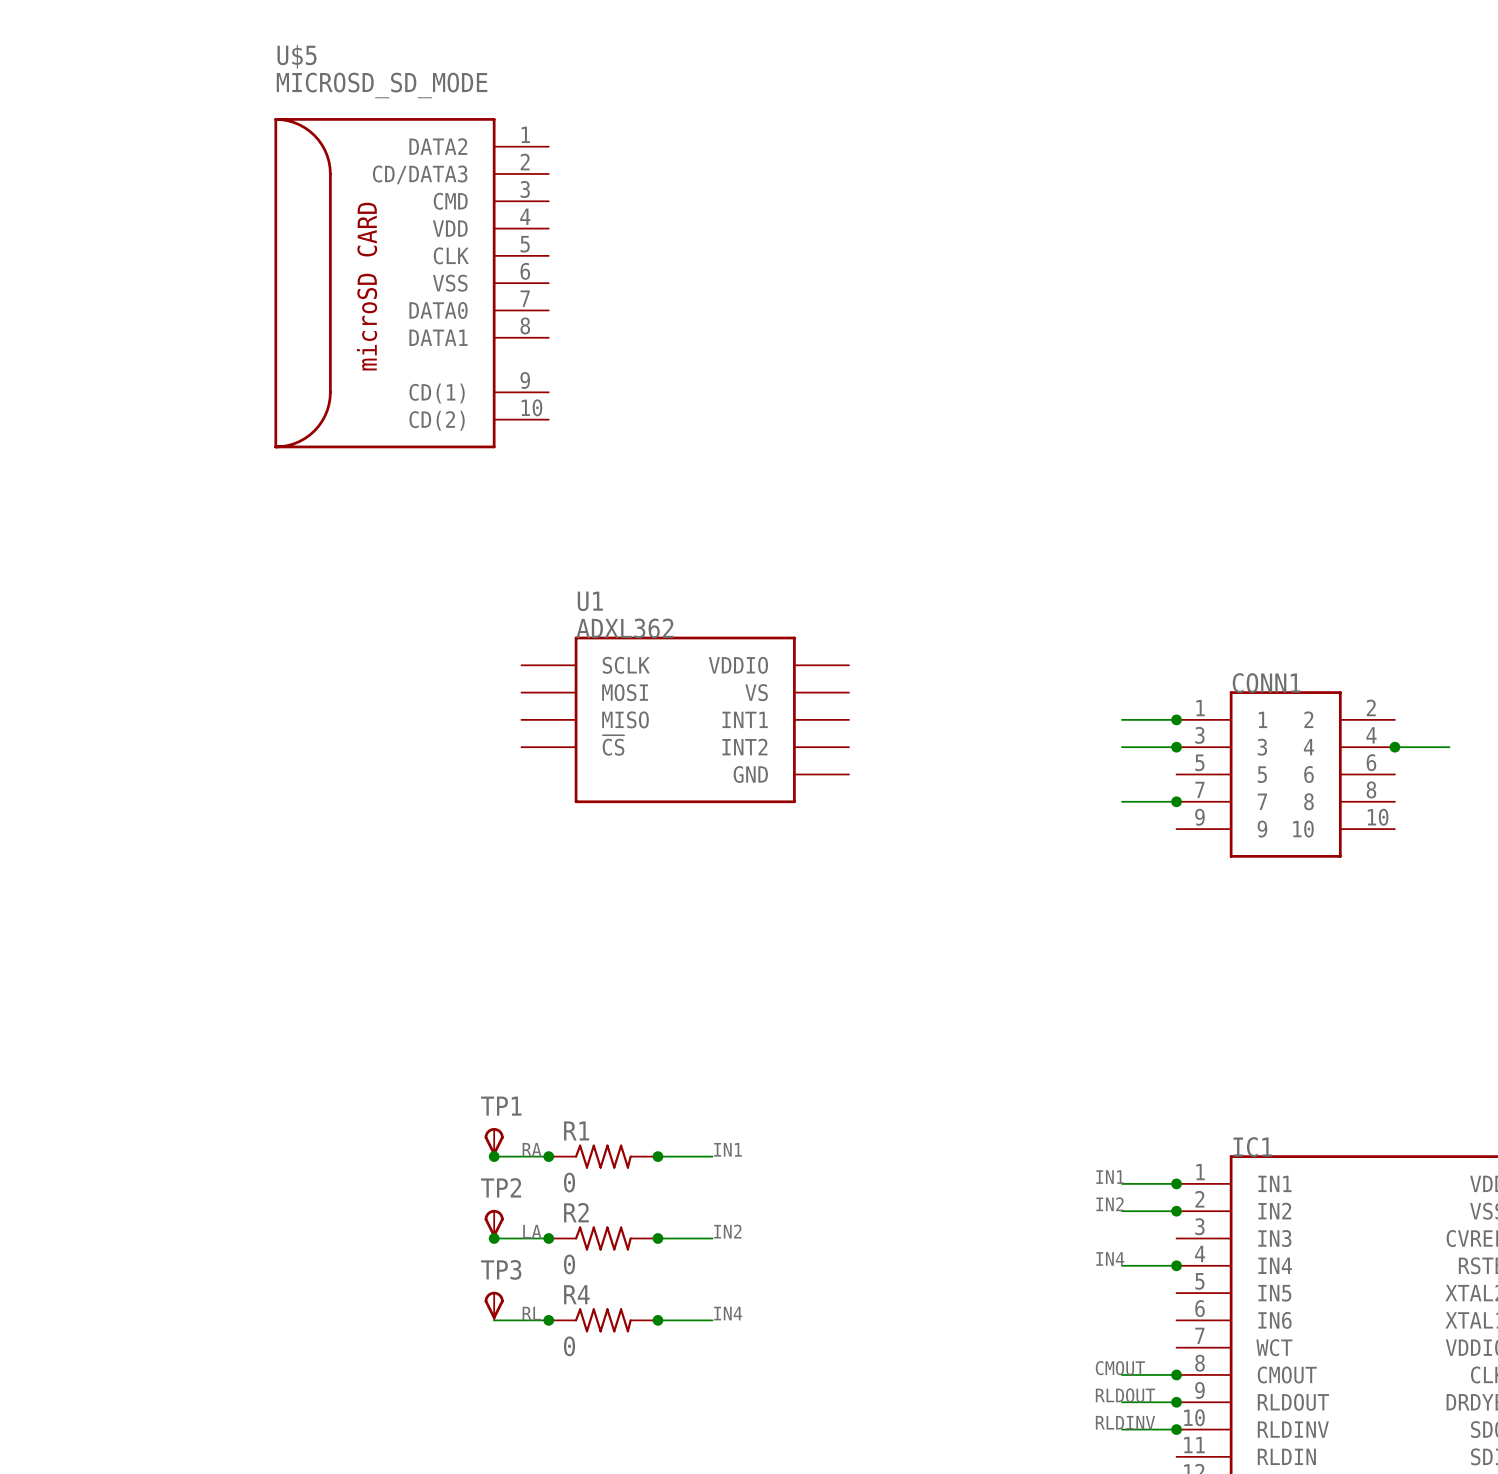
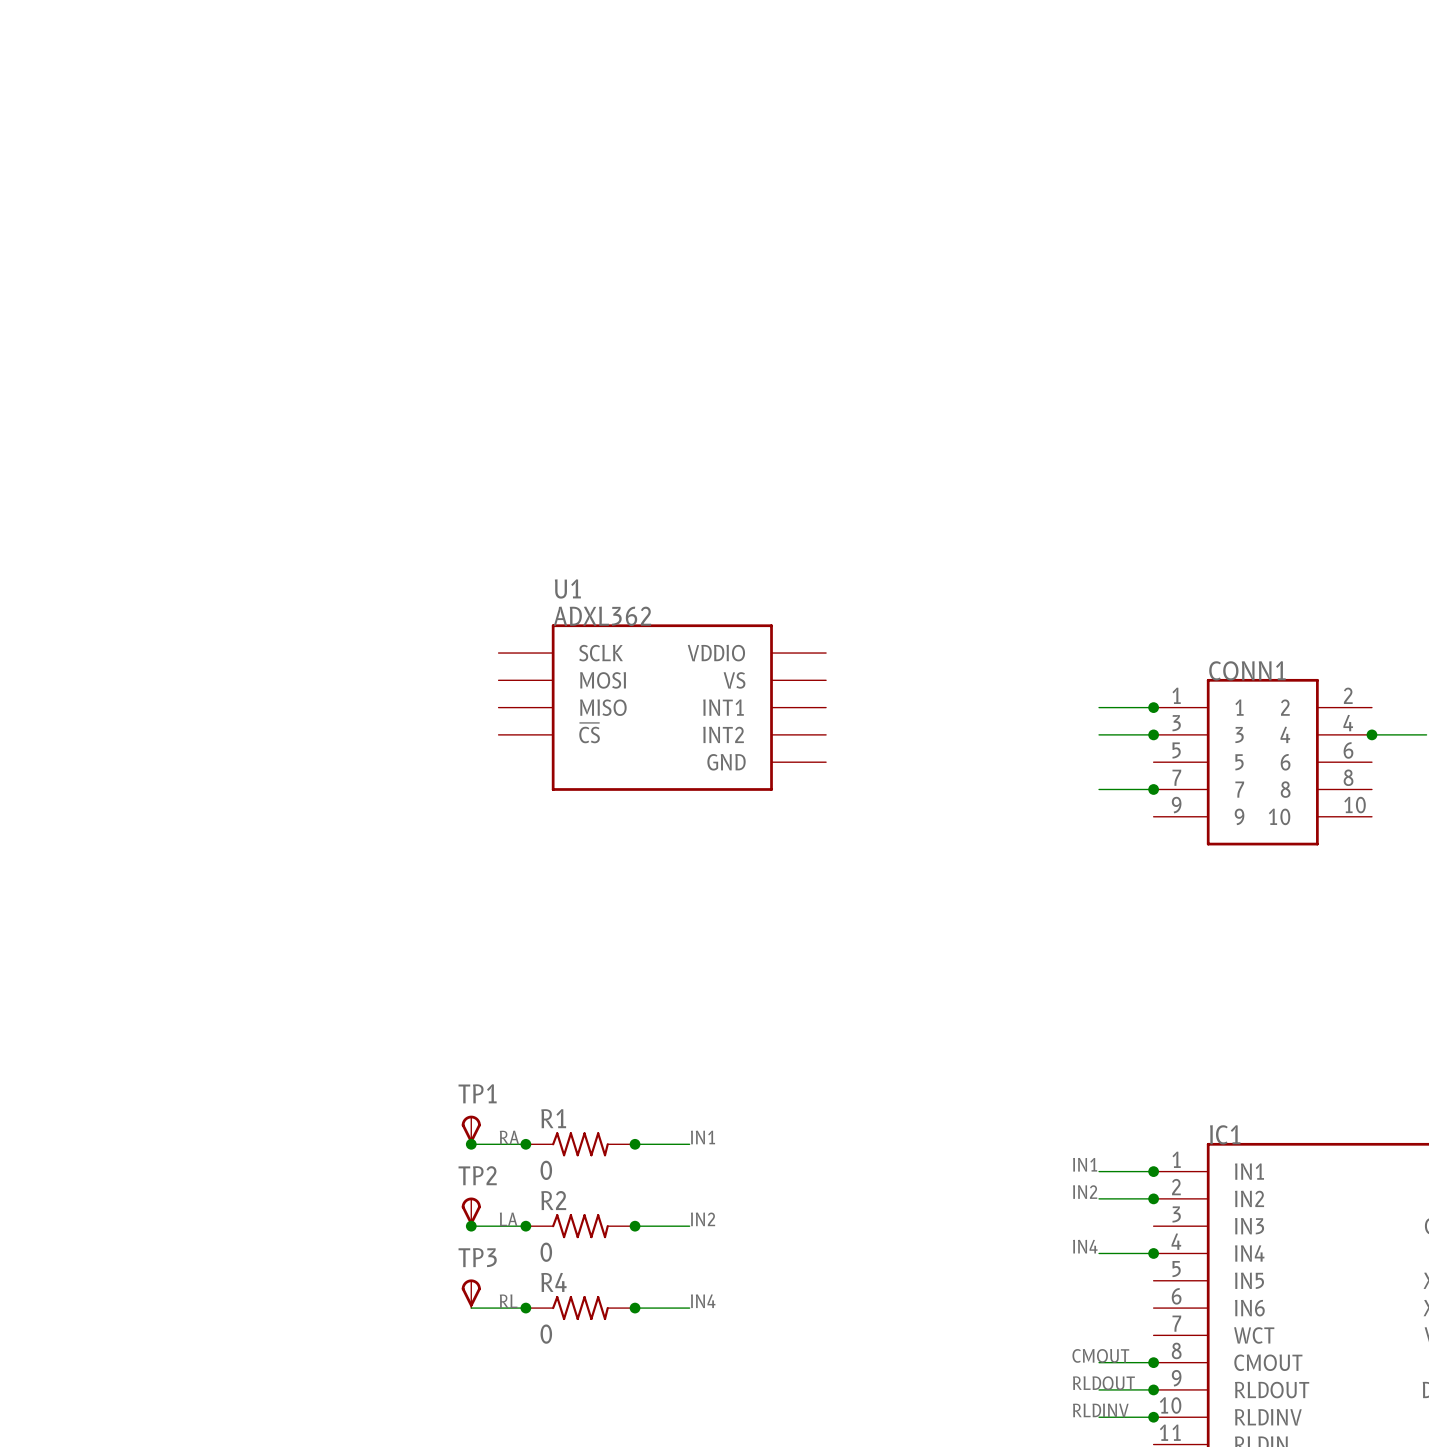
U$5: MICROSD_SD_MODE (411, 283) -> none

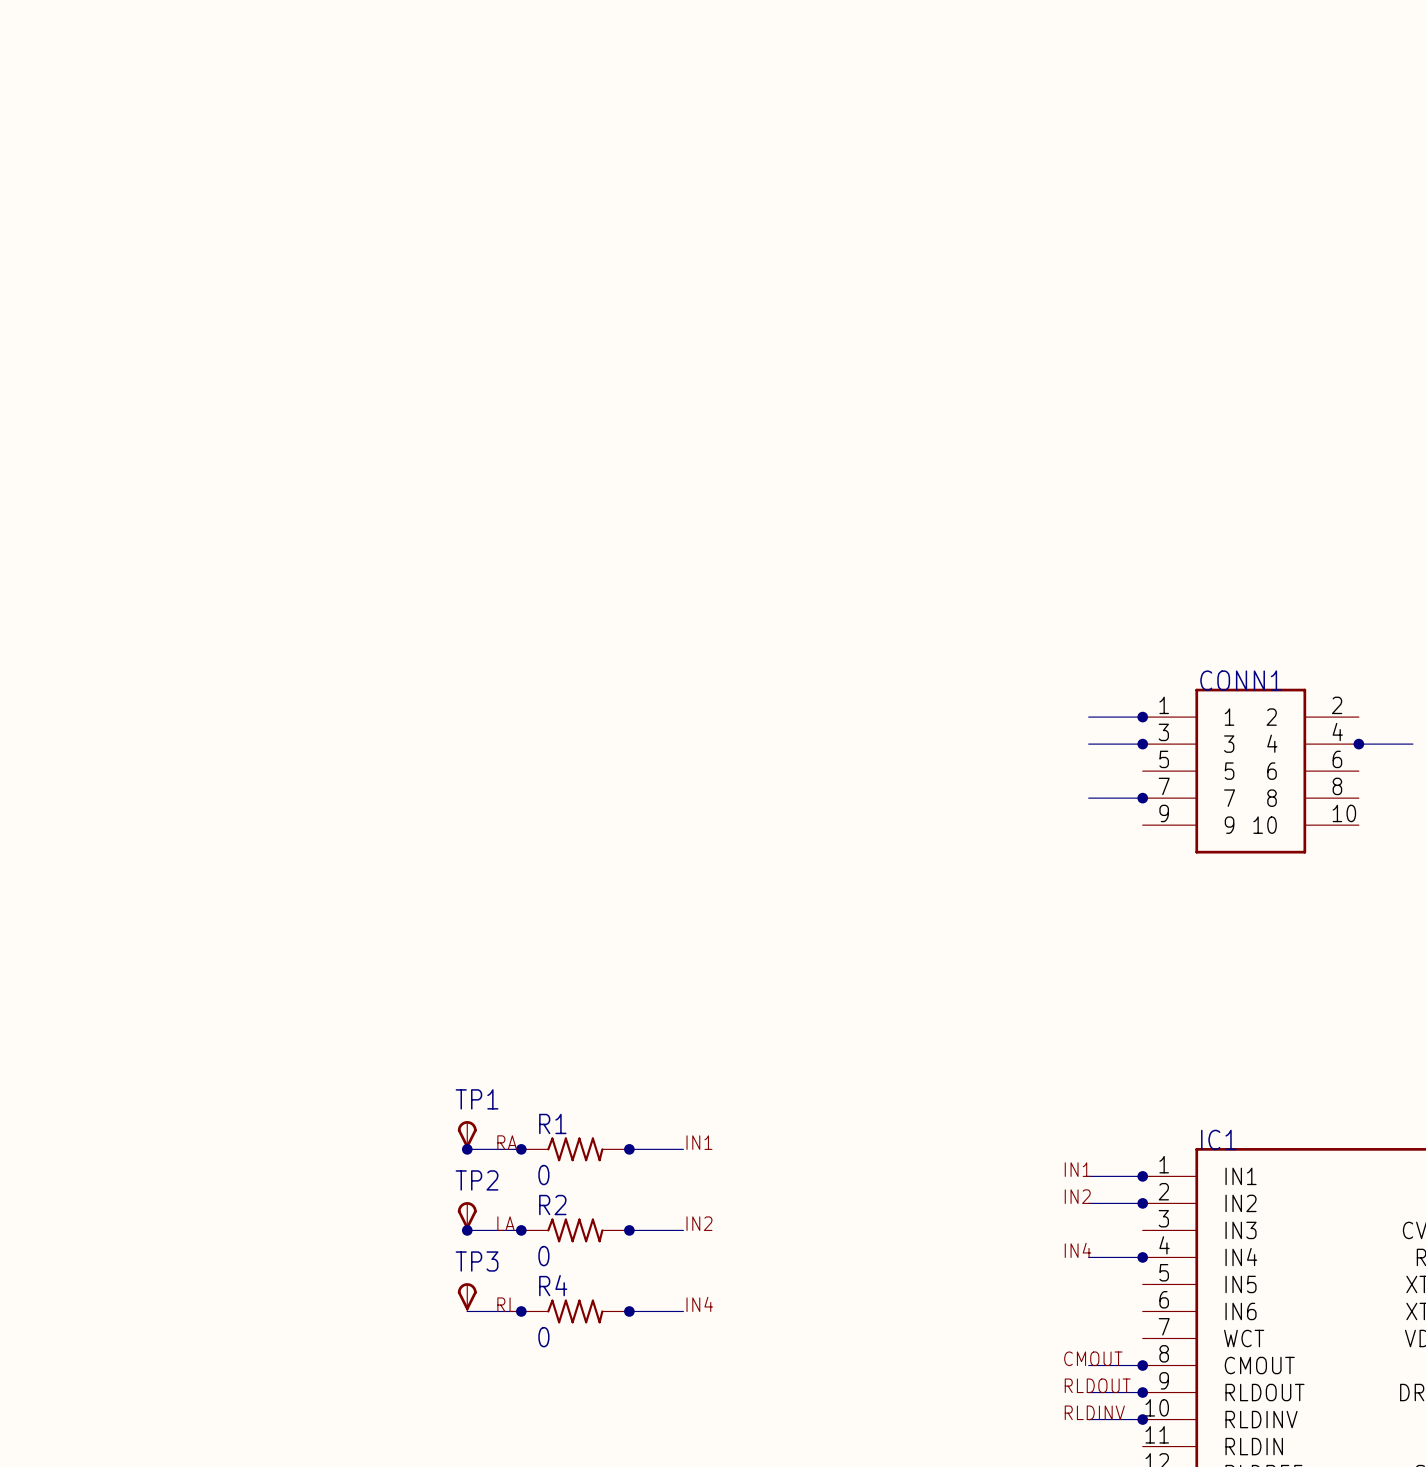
U1: ADXL362 (662, 707) -> none

